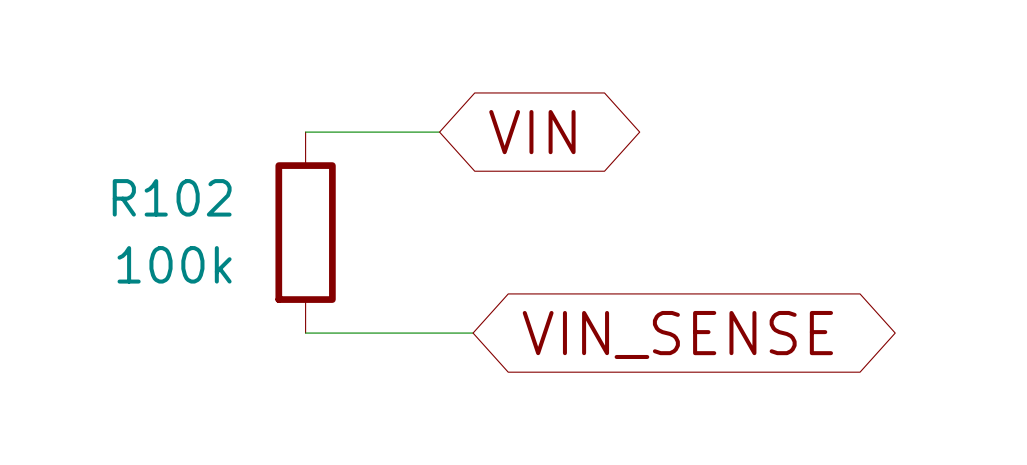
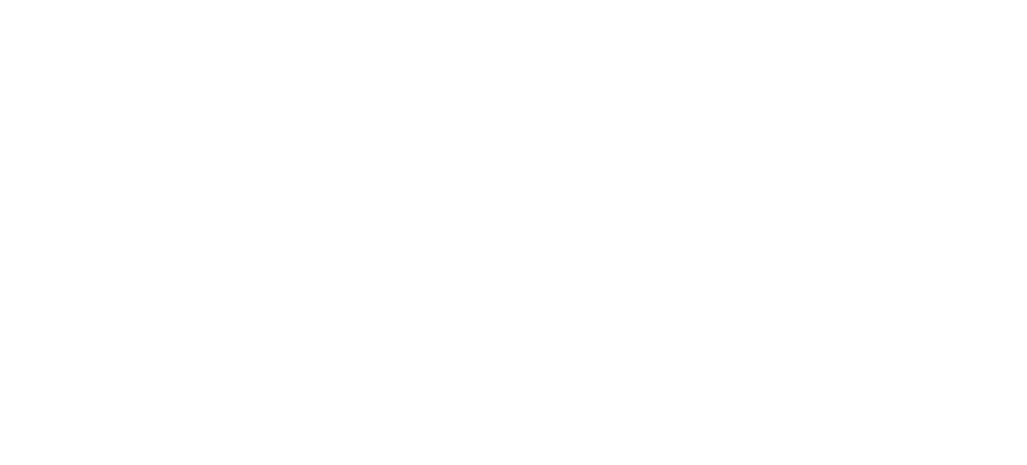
wire: (305, 132) (439, 132) -> none
global label: VIN (532, 132) -> none
R102: 100k (305, 232) -> none
wire: (305, 333) (473, 333) -> none
global label: VIN_SENSE (677, 334) -> none

